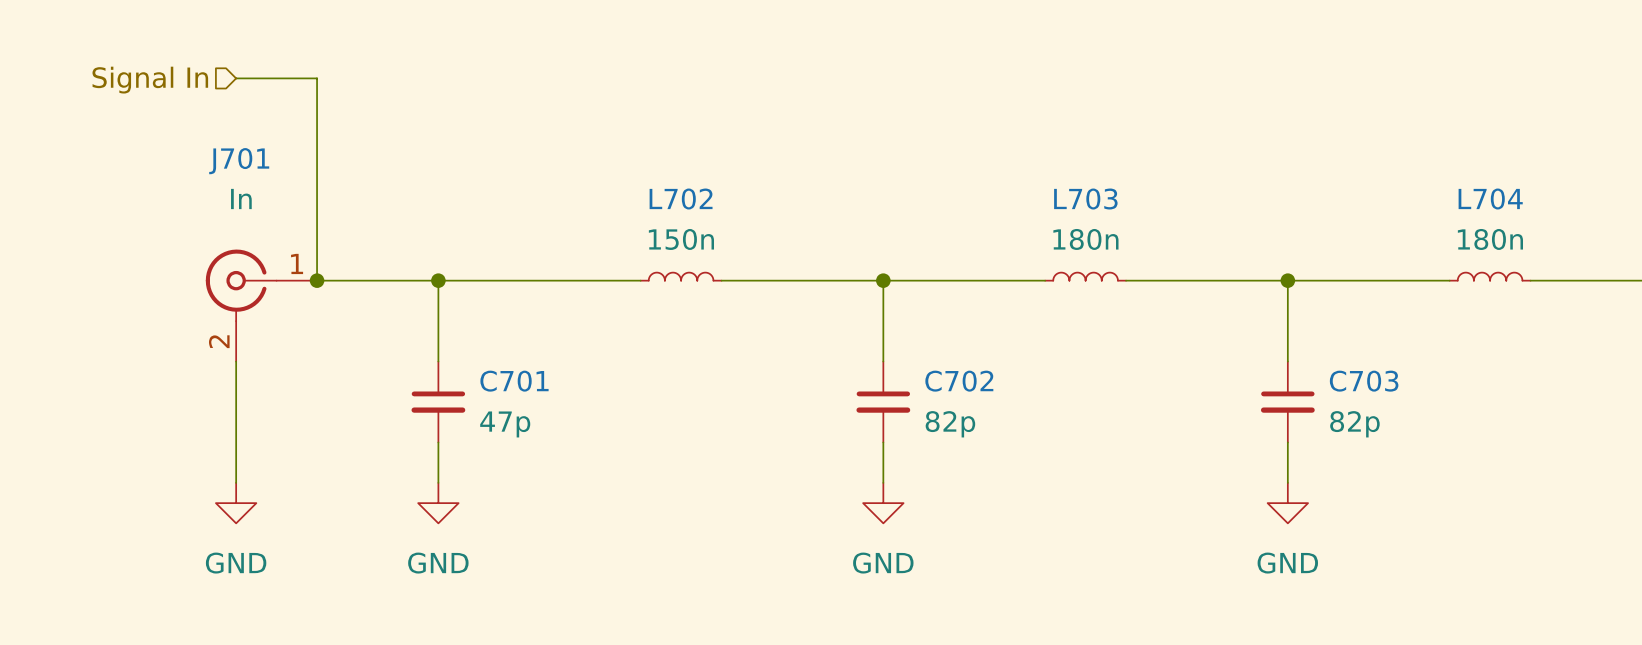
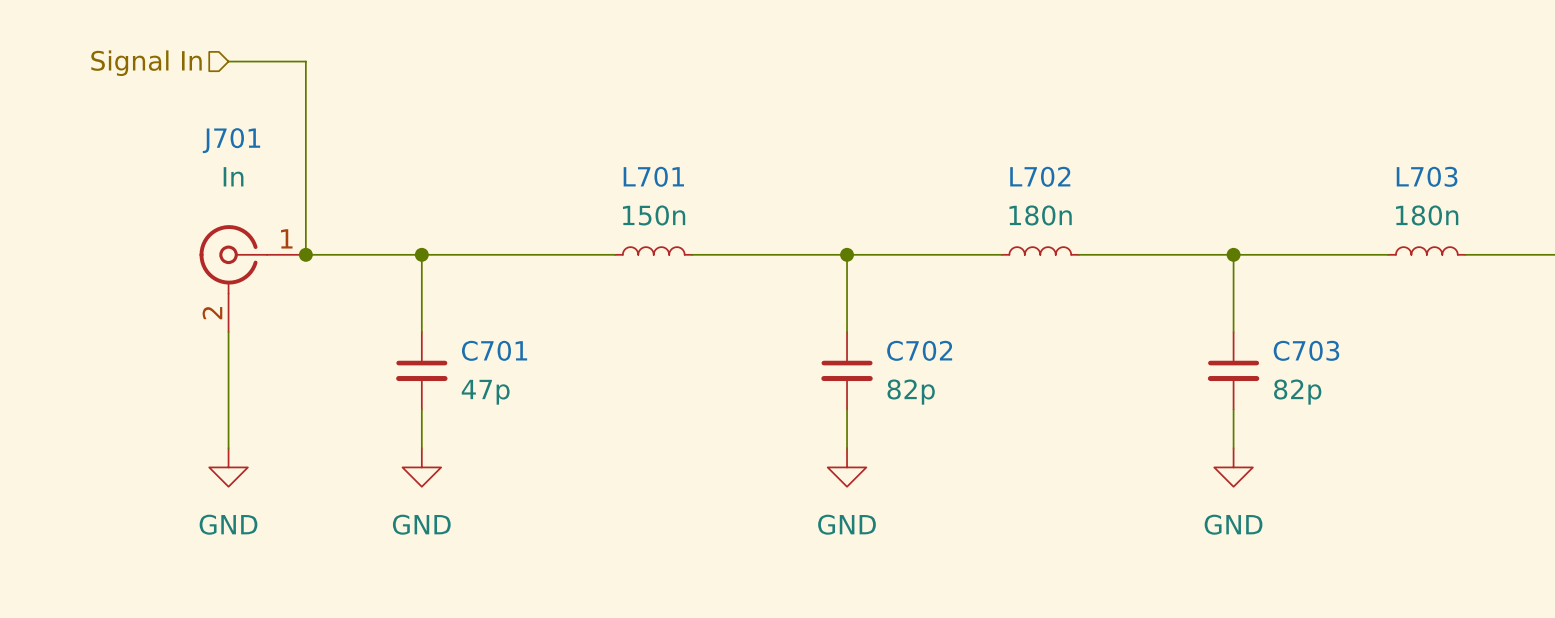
L702 name: L702 (681, 199) -> L701 (653, 176)
L703 name: L703 (1085, 199) -> L702 (1040, 176)
L704 name: L704 (1490, 199) -> L703 (1427, 176)

